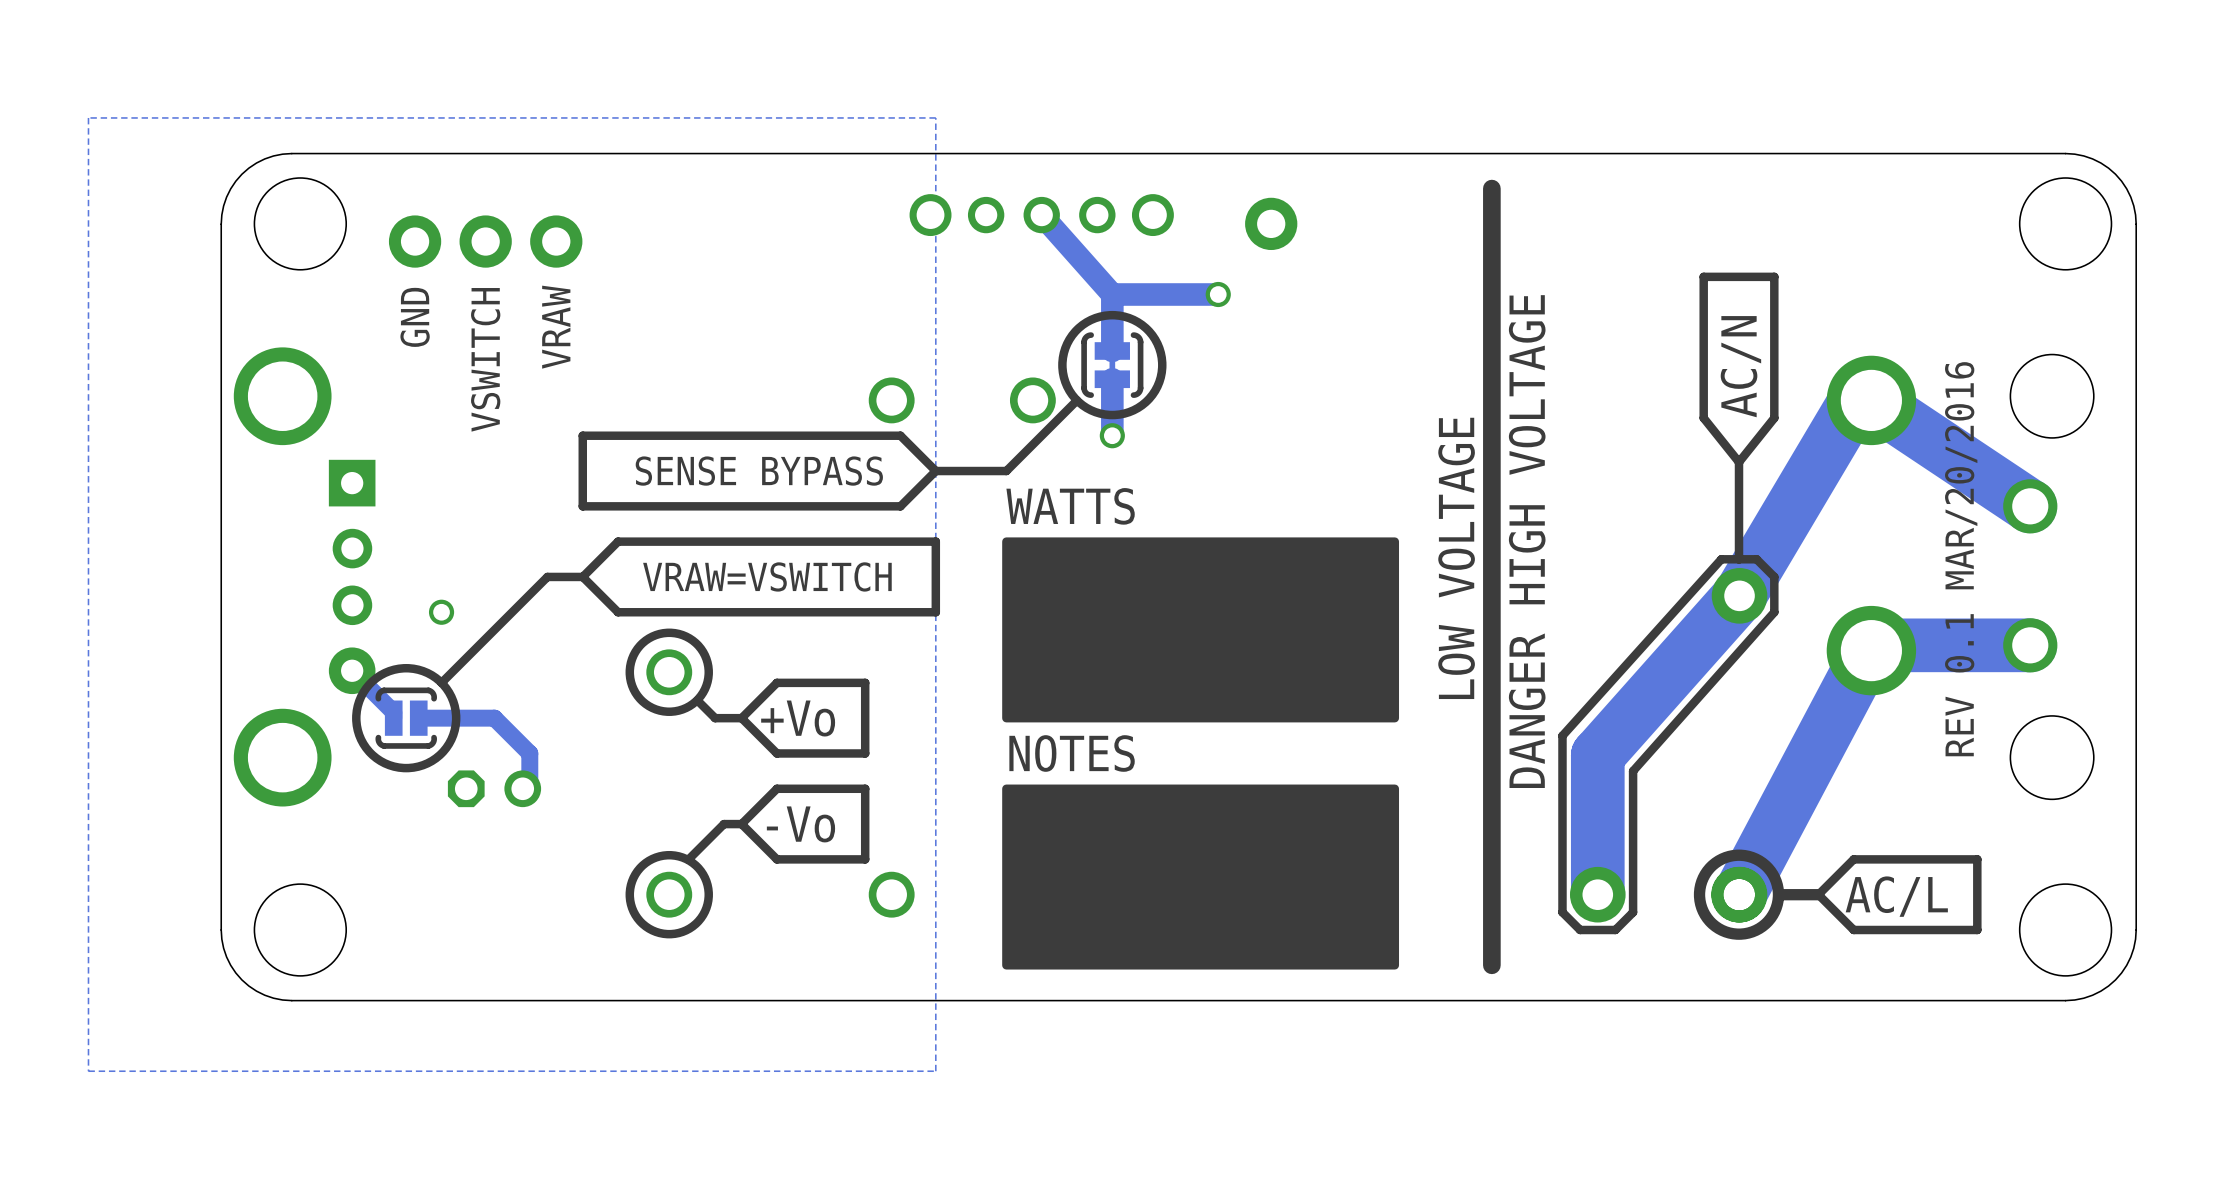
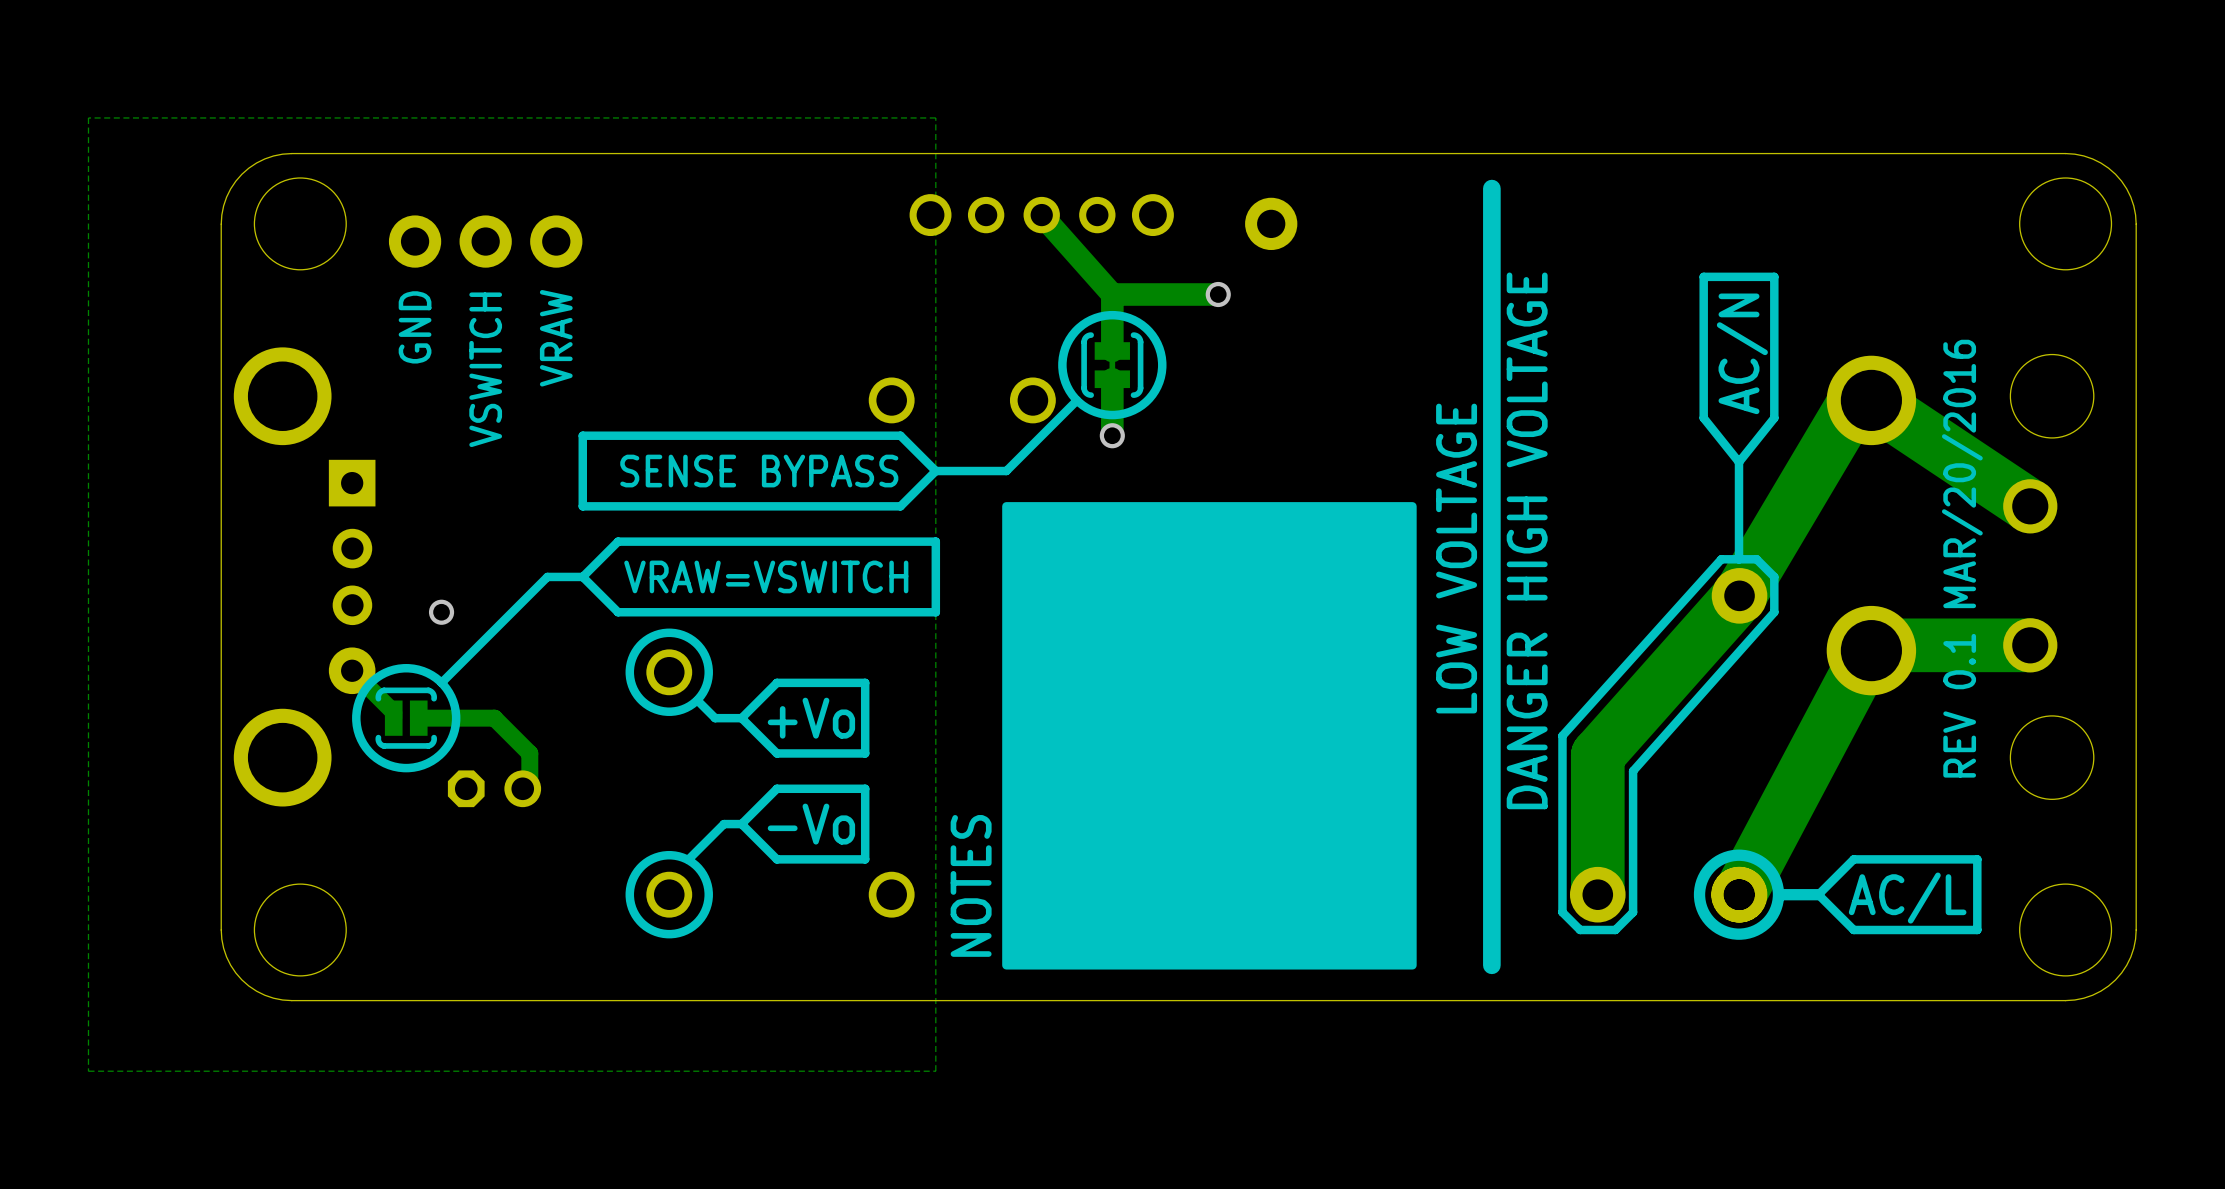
drawing: none -> [1002, 502, 1417, 970]
text: WATTS (1070, 506) -> none
drawing: [1002, 537, 1400, 723] -> none
text rotation: 0° (1072, 753) -> 90° counterclockwise (971, 885)
drawing: [1002, 784, 1400, 970] -> none

